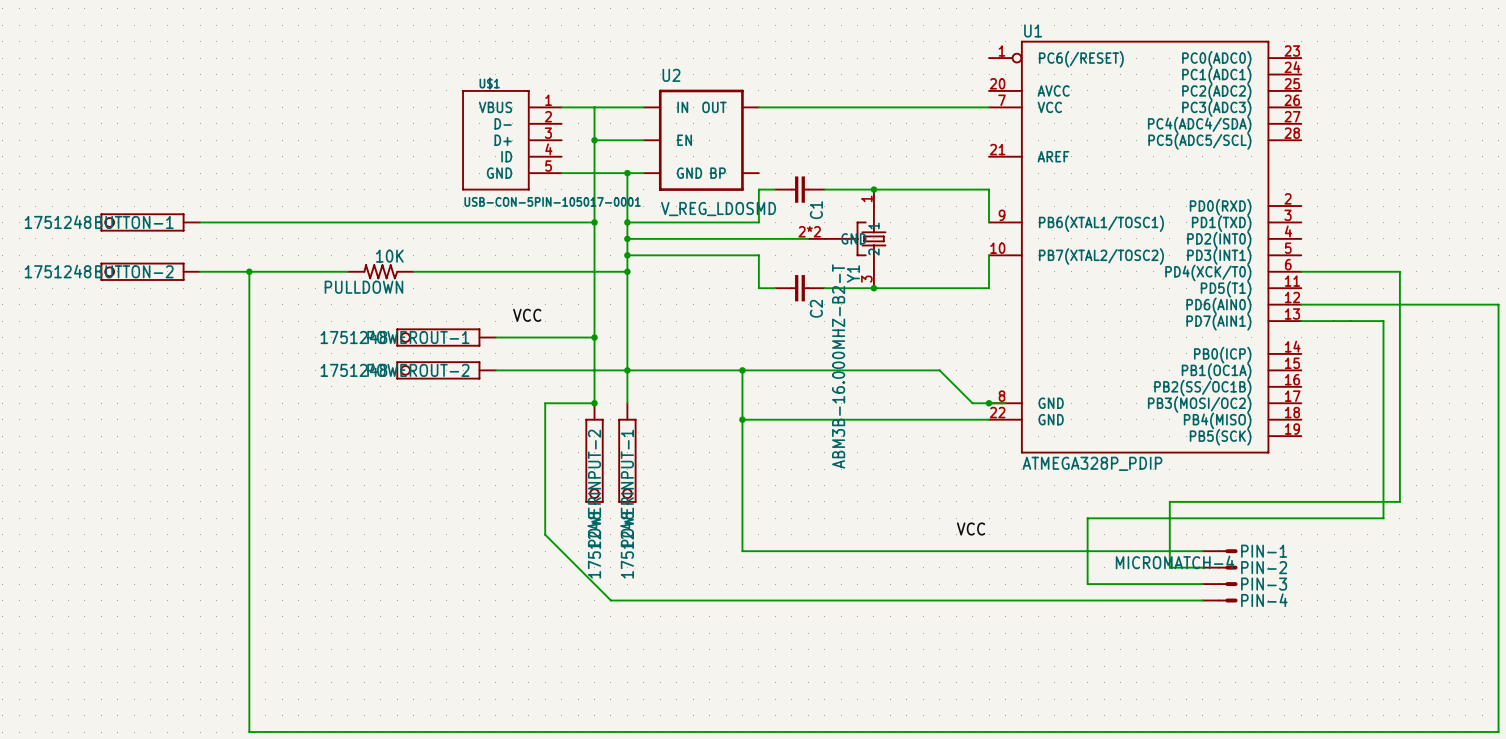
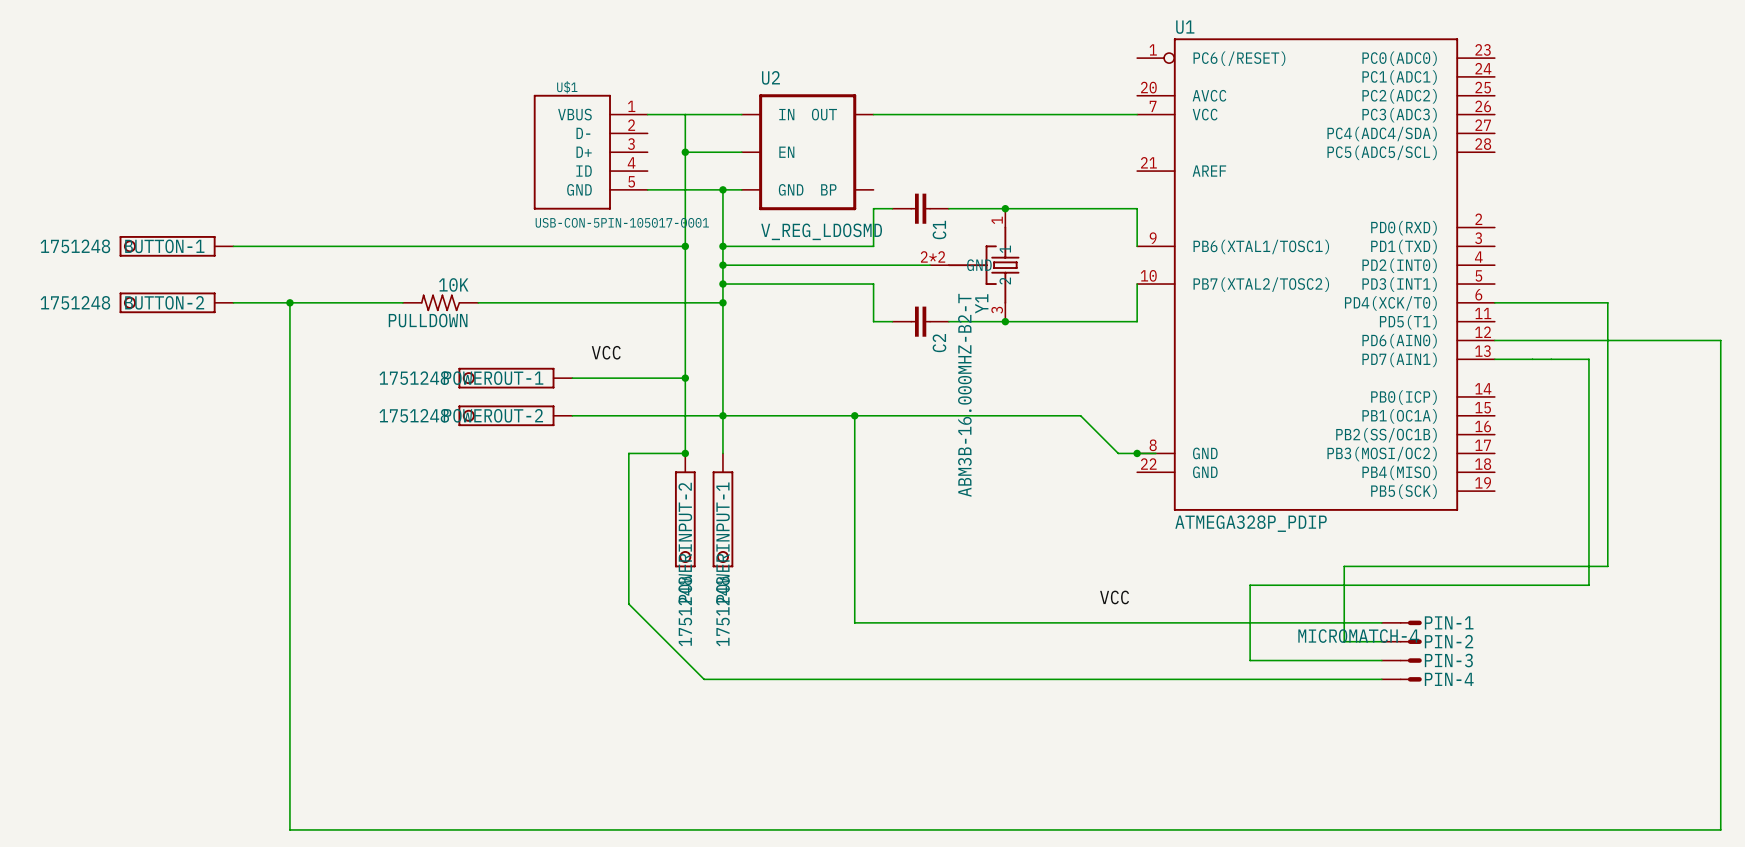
wire: (742, 419) (989, 419) -> none
junction: (742, 419) -> none

